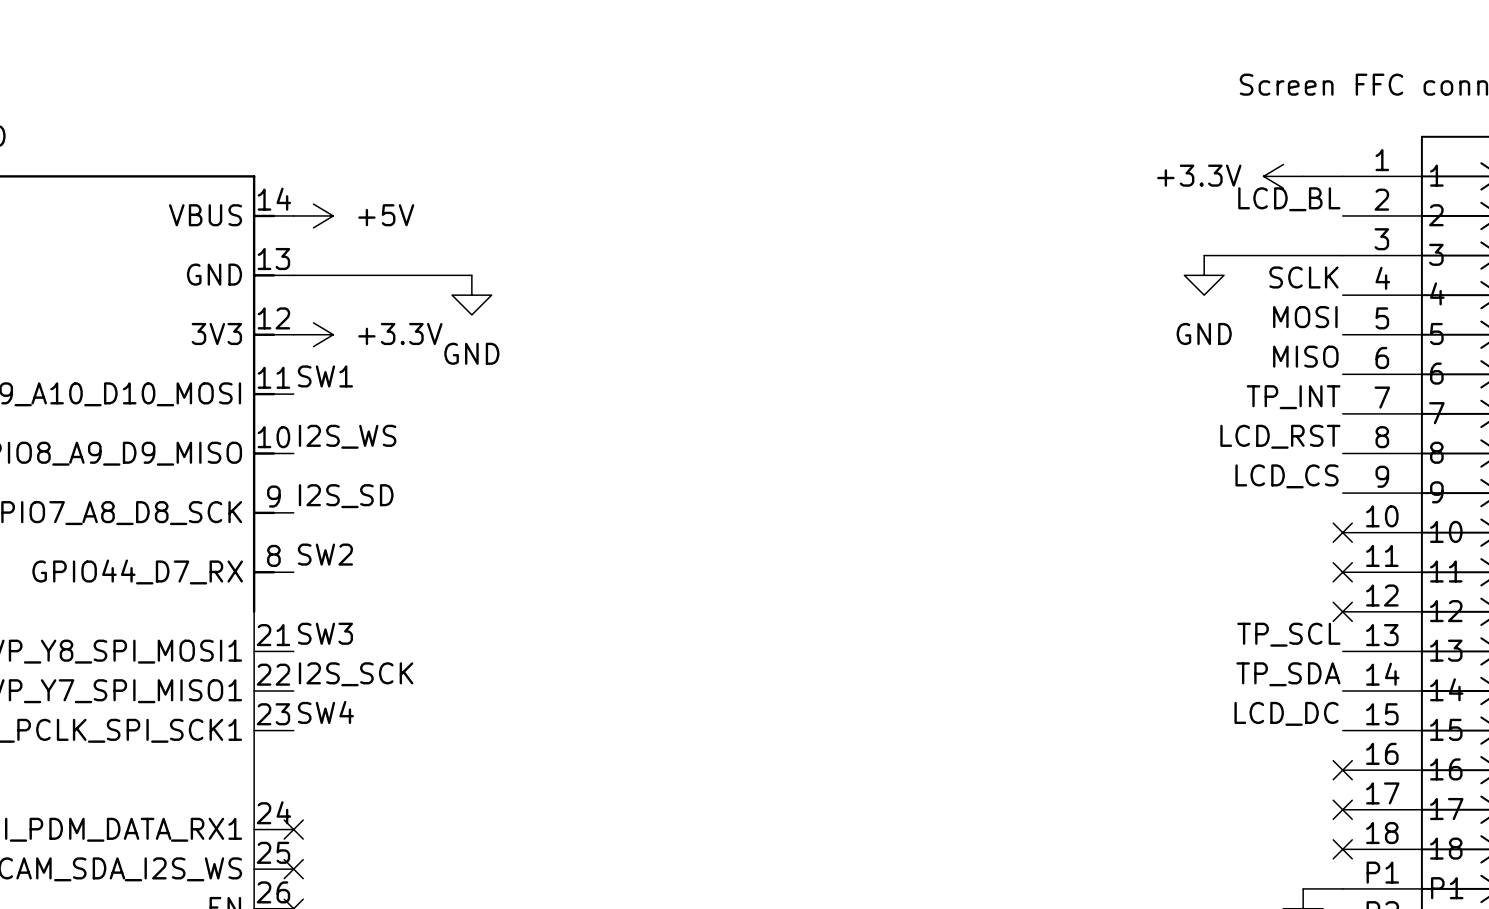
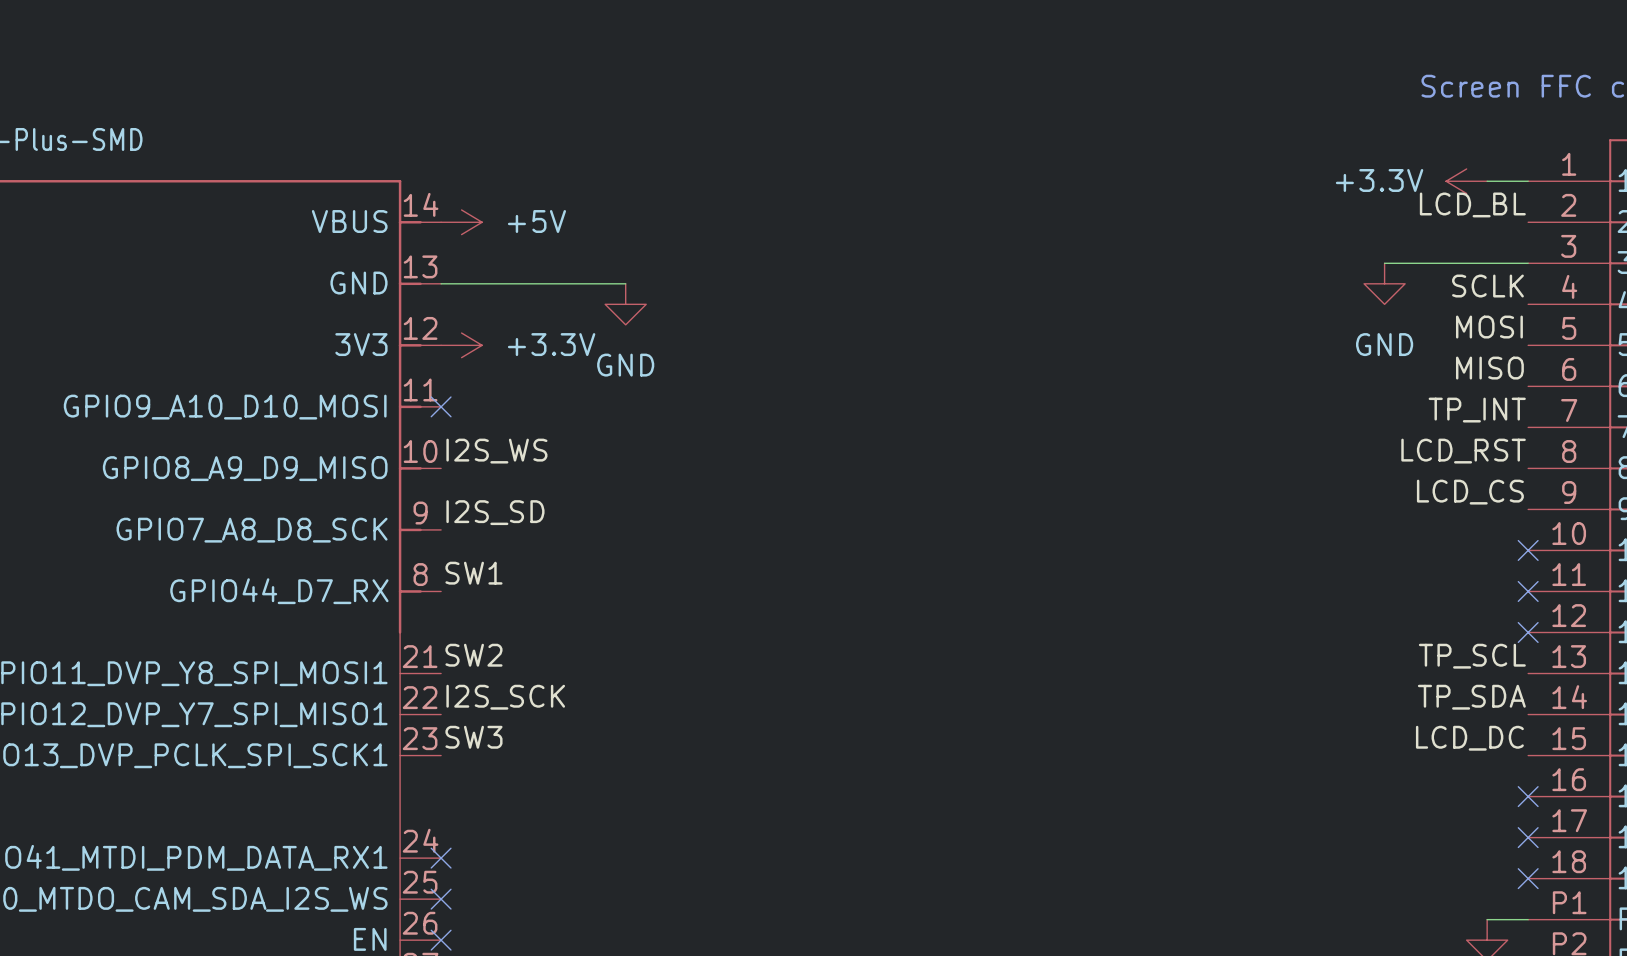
label: SW1 (325, 376) -> none
no-connect mark: none -> (441, 406)
label: SW2 (325, 554) -> SW1 (473, 573)
label: SW3 (325, 633) -> SW2 (473, 655)
label: SW4 (325, 712) -> SW3 (473, 737)

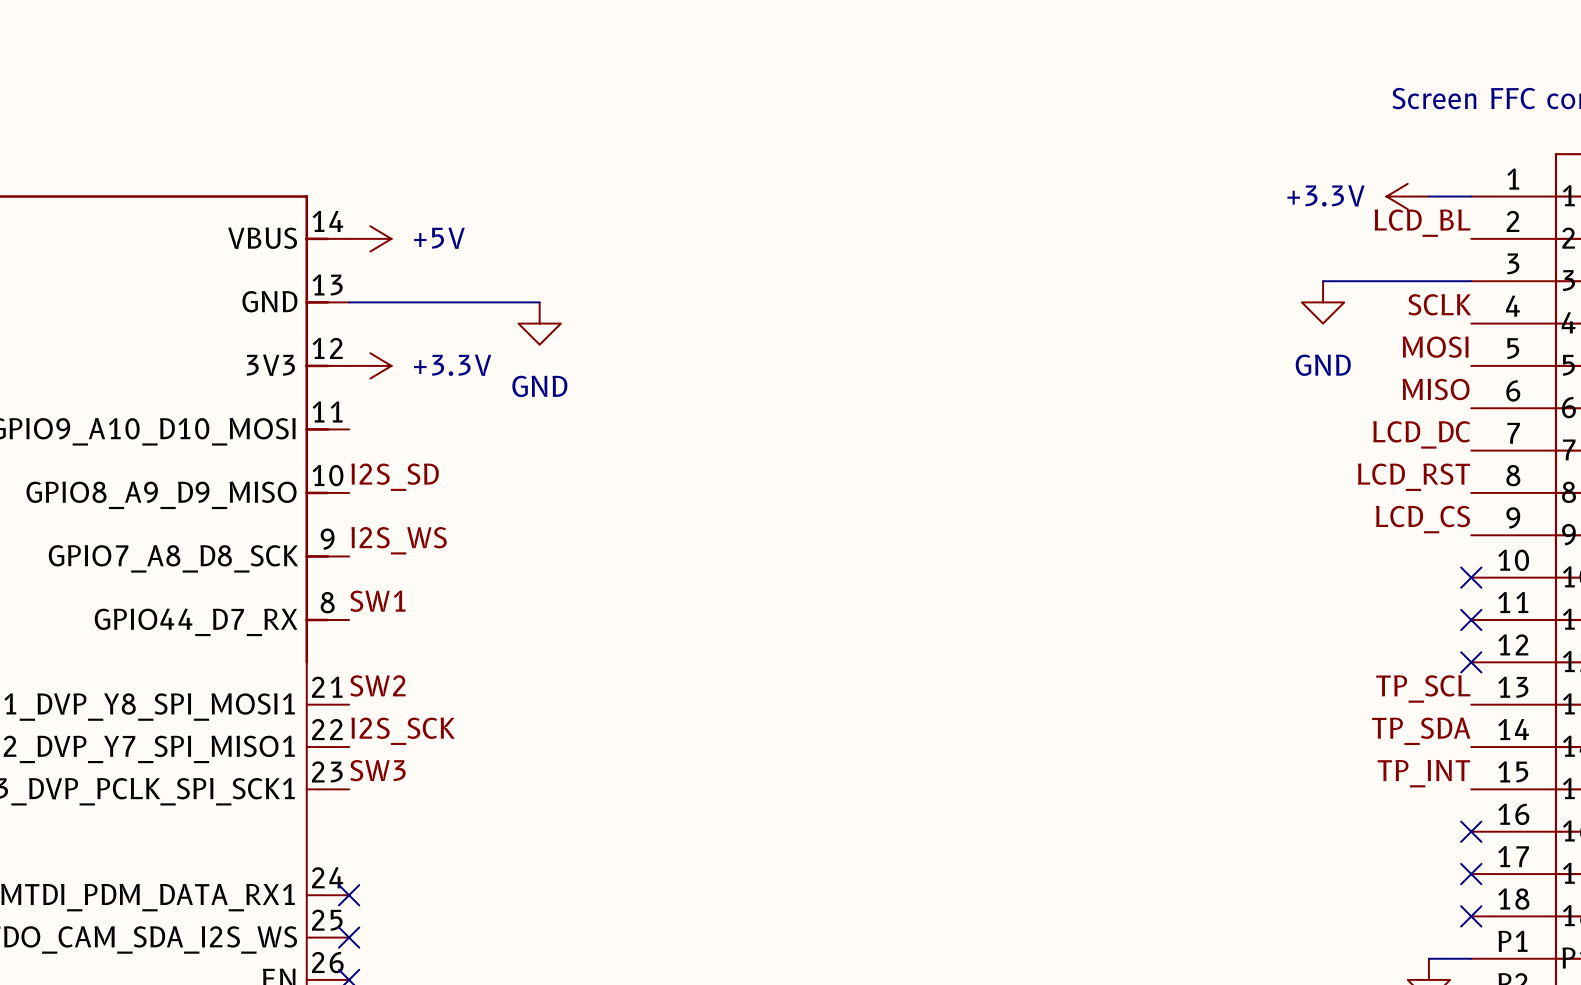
no-connect mark: (441, 406) -> none
label: TP_INT (1477, 410) -> LCD_DC (1421, 434)
label: I2S_WS (496, 451) -> I2S_SD (395, 477)
label: I2S_SD (495, 512) -> I2S_WS (399, 540)
label: LCD_DC (1469, 738) -> TP_INT (1423, 773)

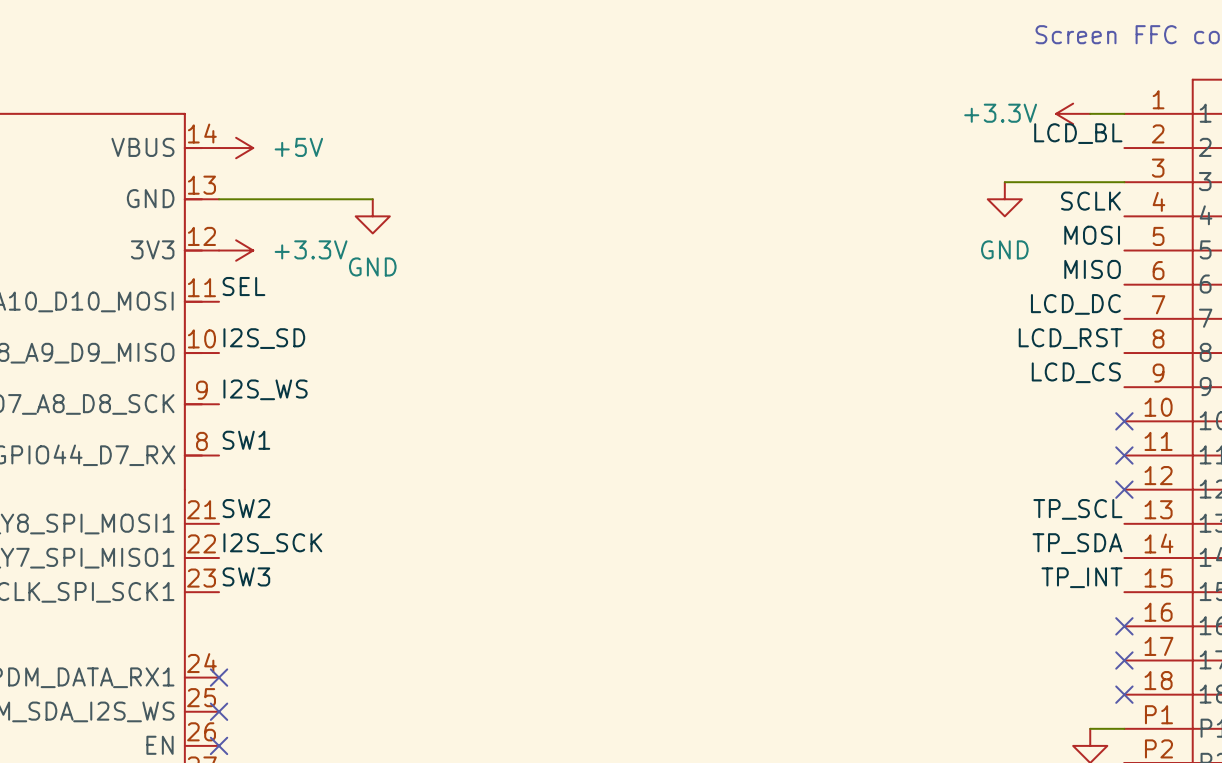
label: none -> SEL (243, 286)

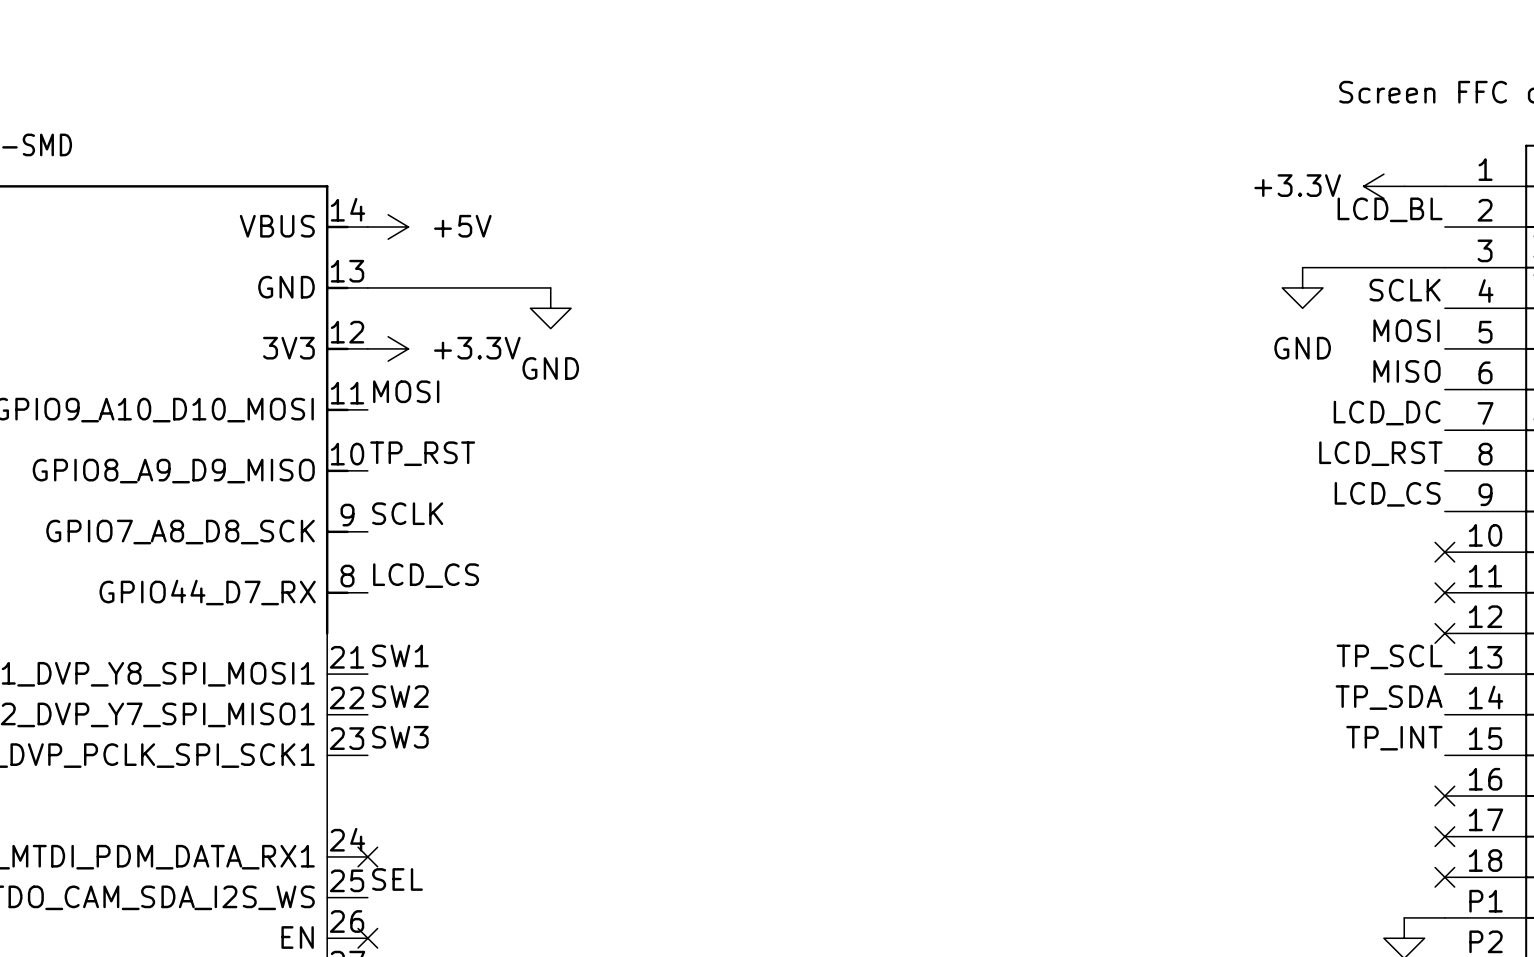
label: SEL (243, 286) -> MOSI (406, 391)
label: I2S_SD (264, 338) -> TP_RST (422, 453)
label: I2S_WS (265, 389) -> SCLK (407, 513)
label: SW1 (246, 440) -> LCD_CS (426, 575)
label: SW2 (246, 508) -> SW1 (400, 655)
label: I2S_SCK (272, 543) -> SW2 (400, 696)
label: none -> SEL (397, 879)
no-connect mark: (219, 711) -> none

